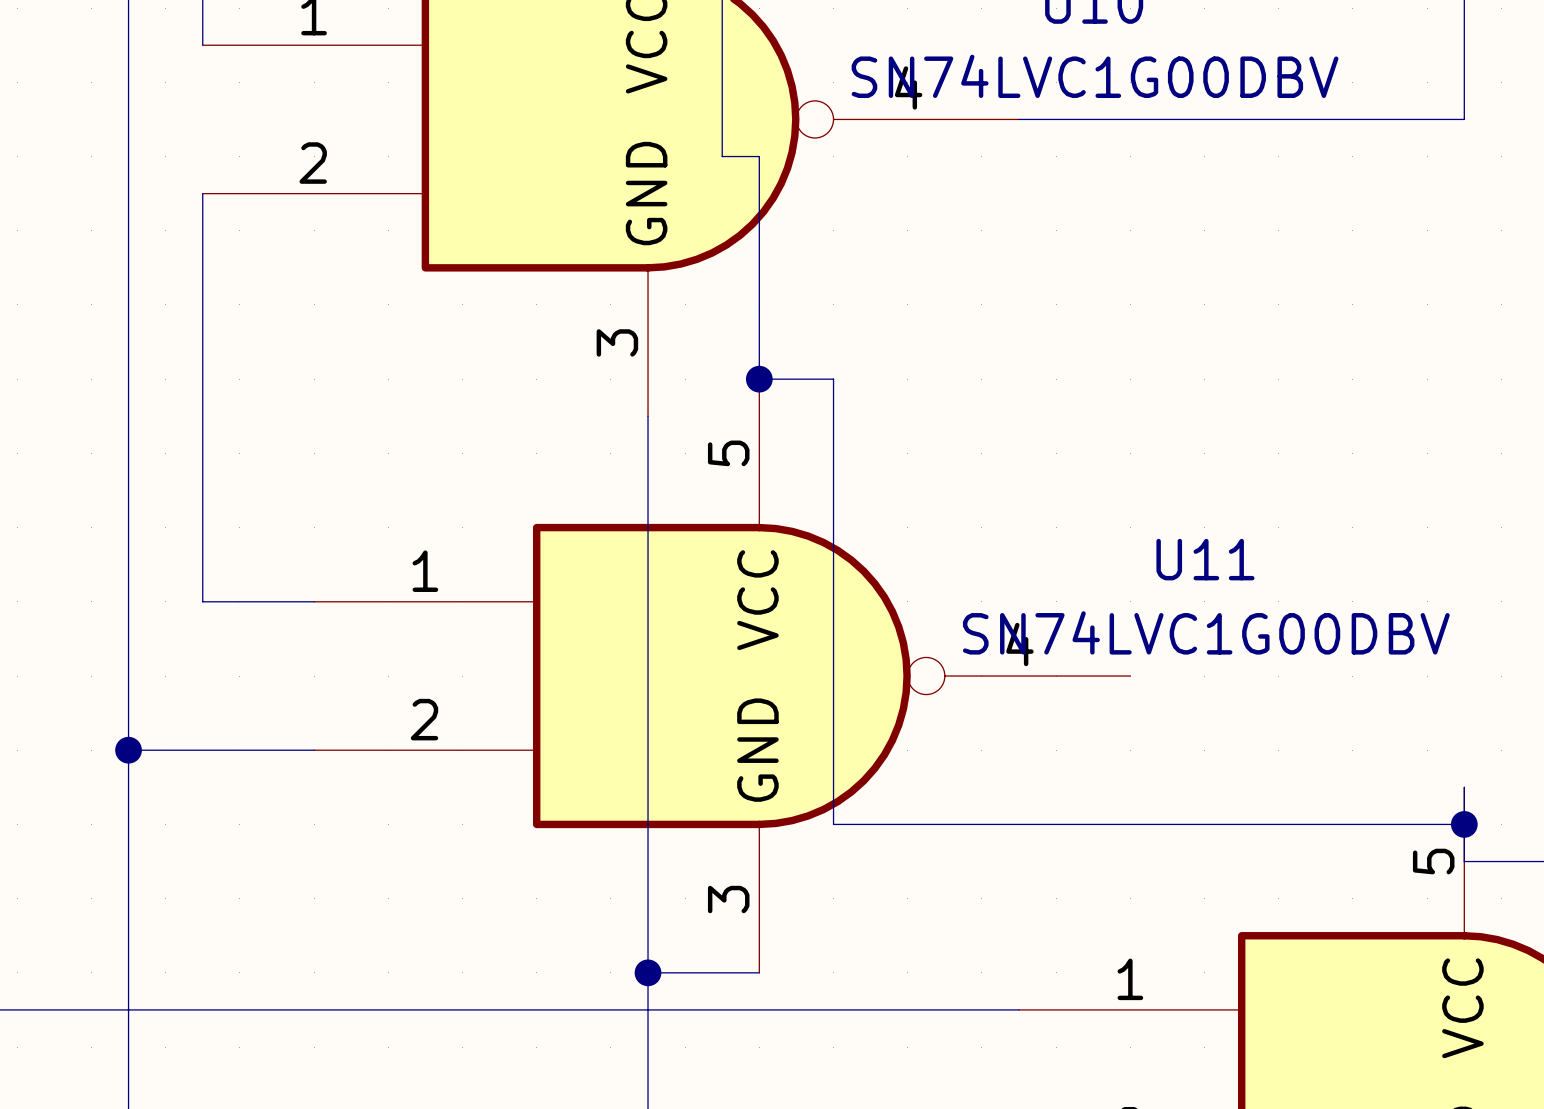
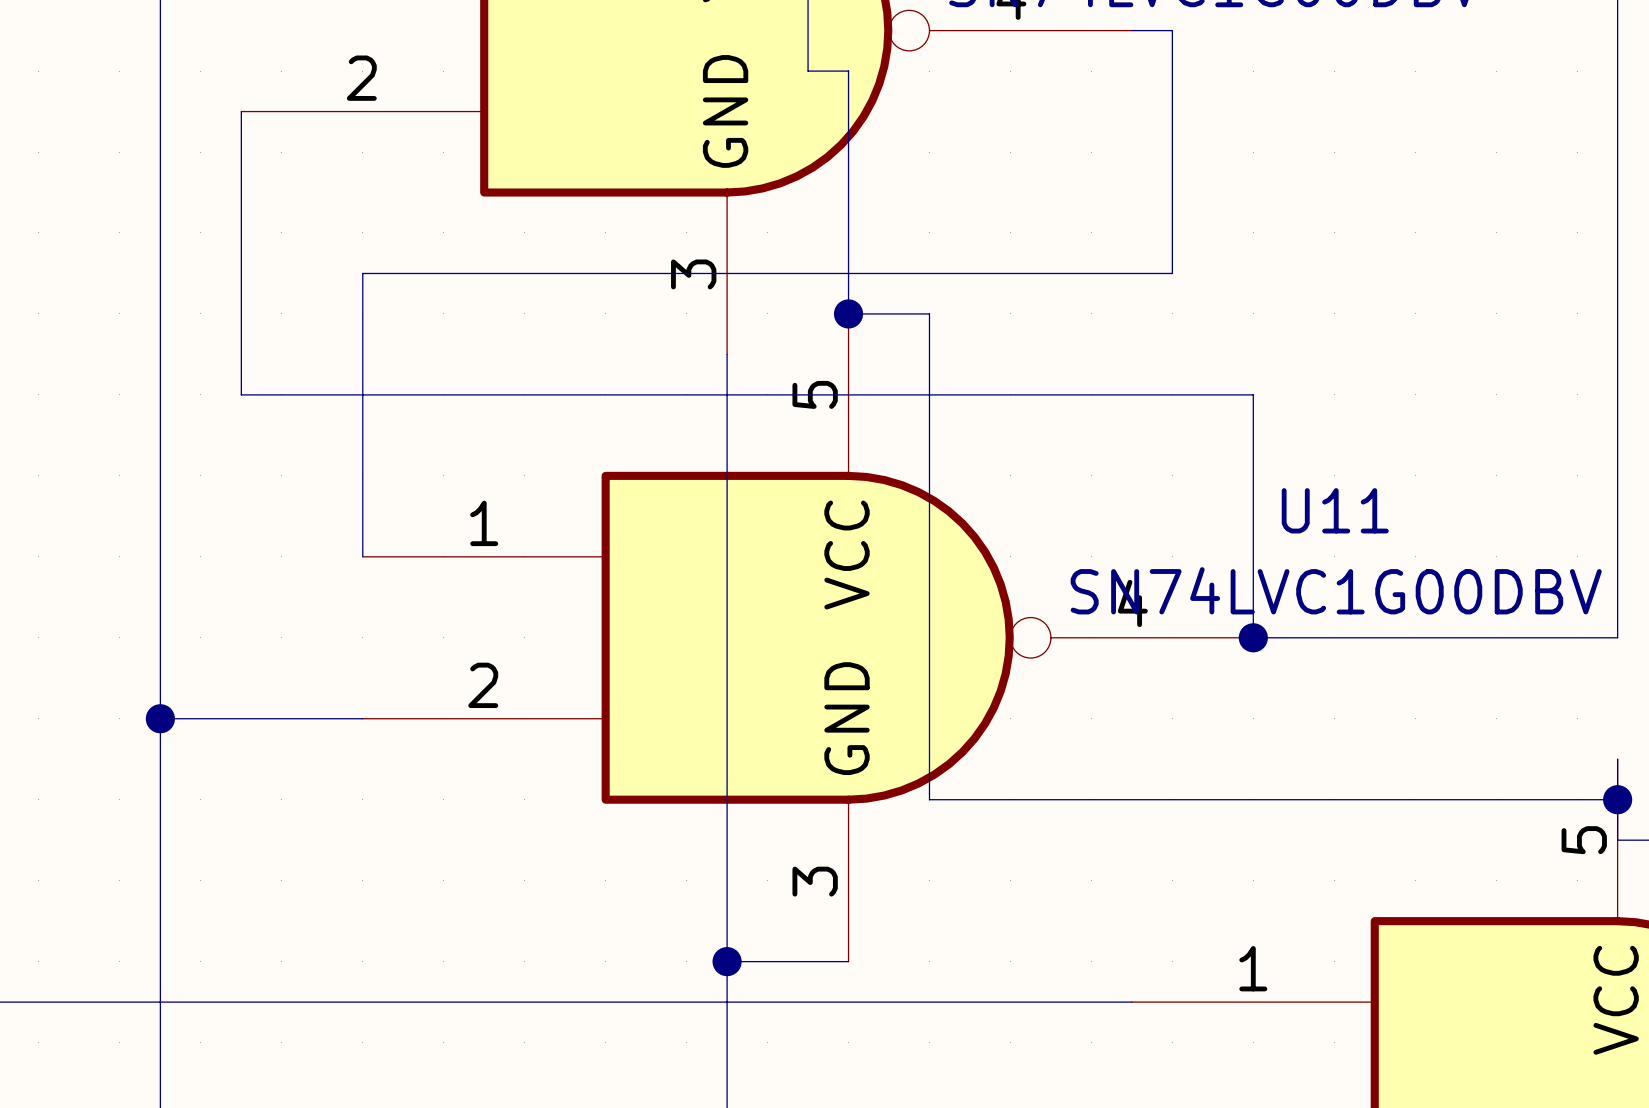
wire: (1056, 119) (1464, 119) -> (241, 394) (1253, 394) (1253, 637) (1617, 637) (1617, 30)
wire: (202, 453) (202, 601) (314, 601) -> (1172, 30) (1172, 273) (362, 273) (362, 556)
junction: none -> (1253, 637)

